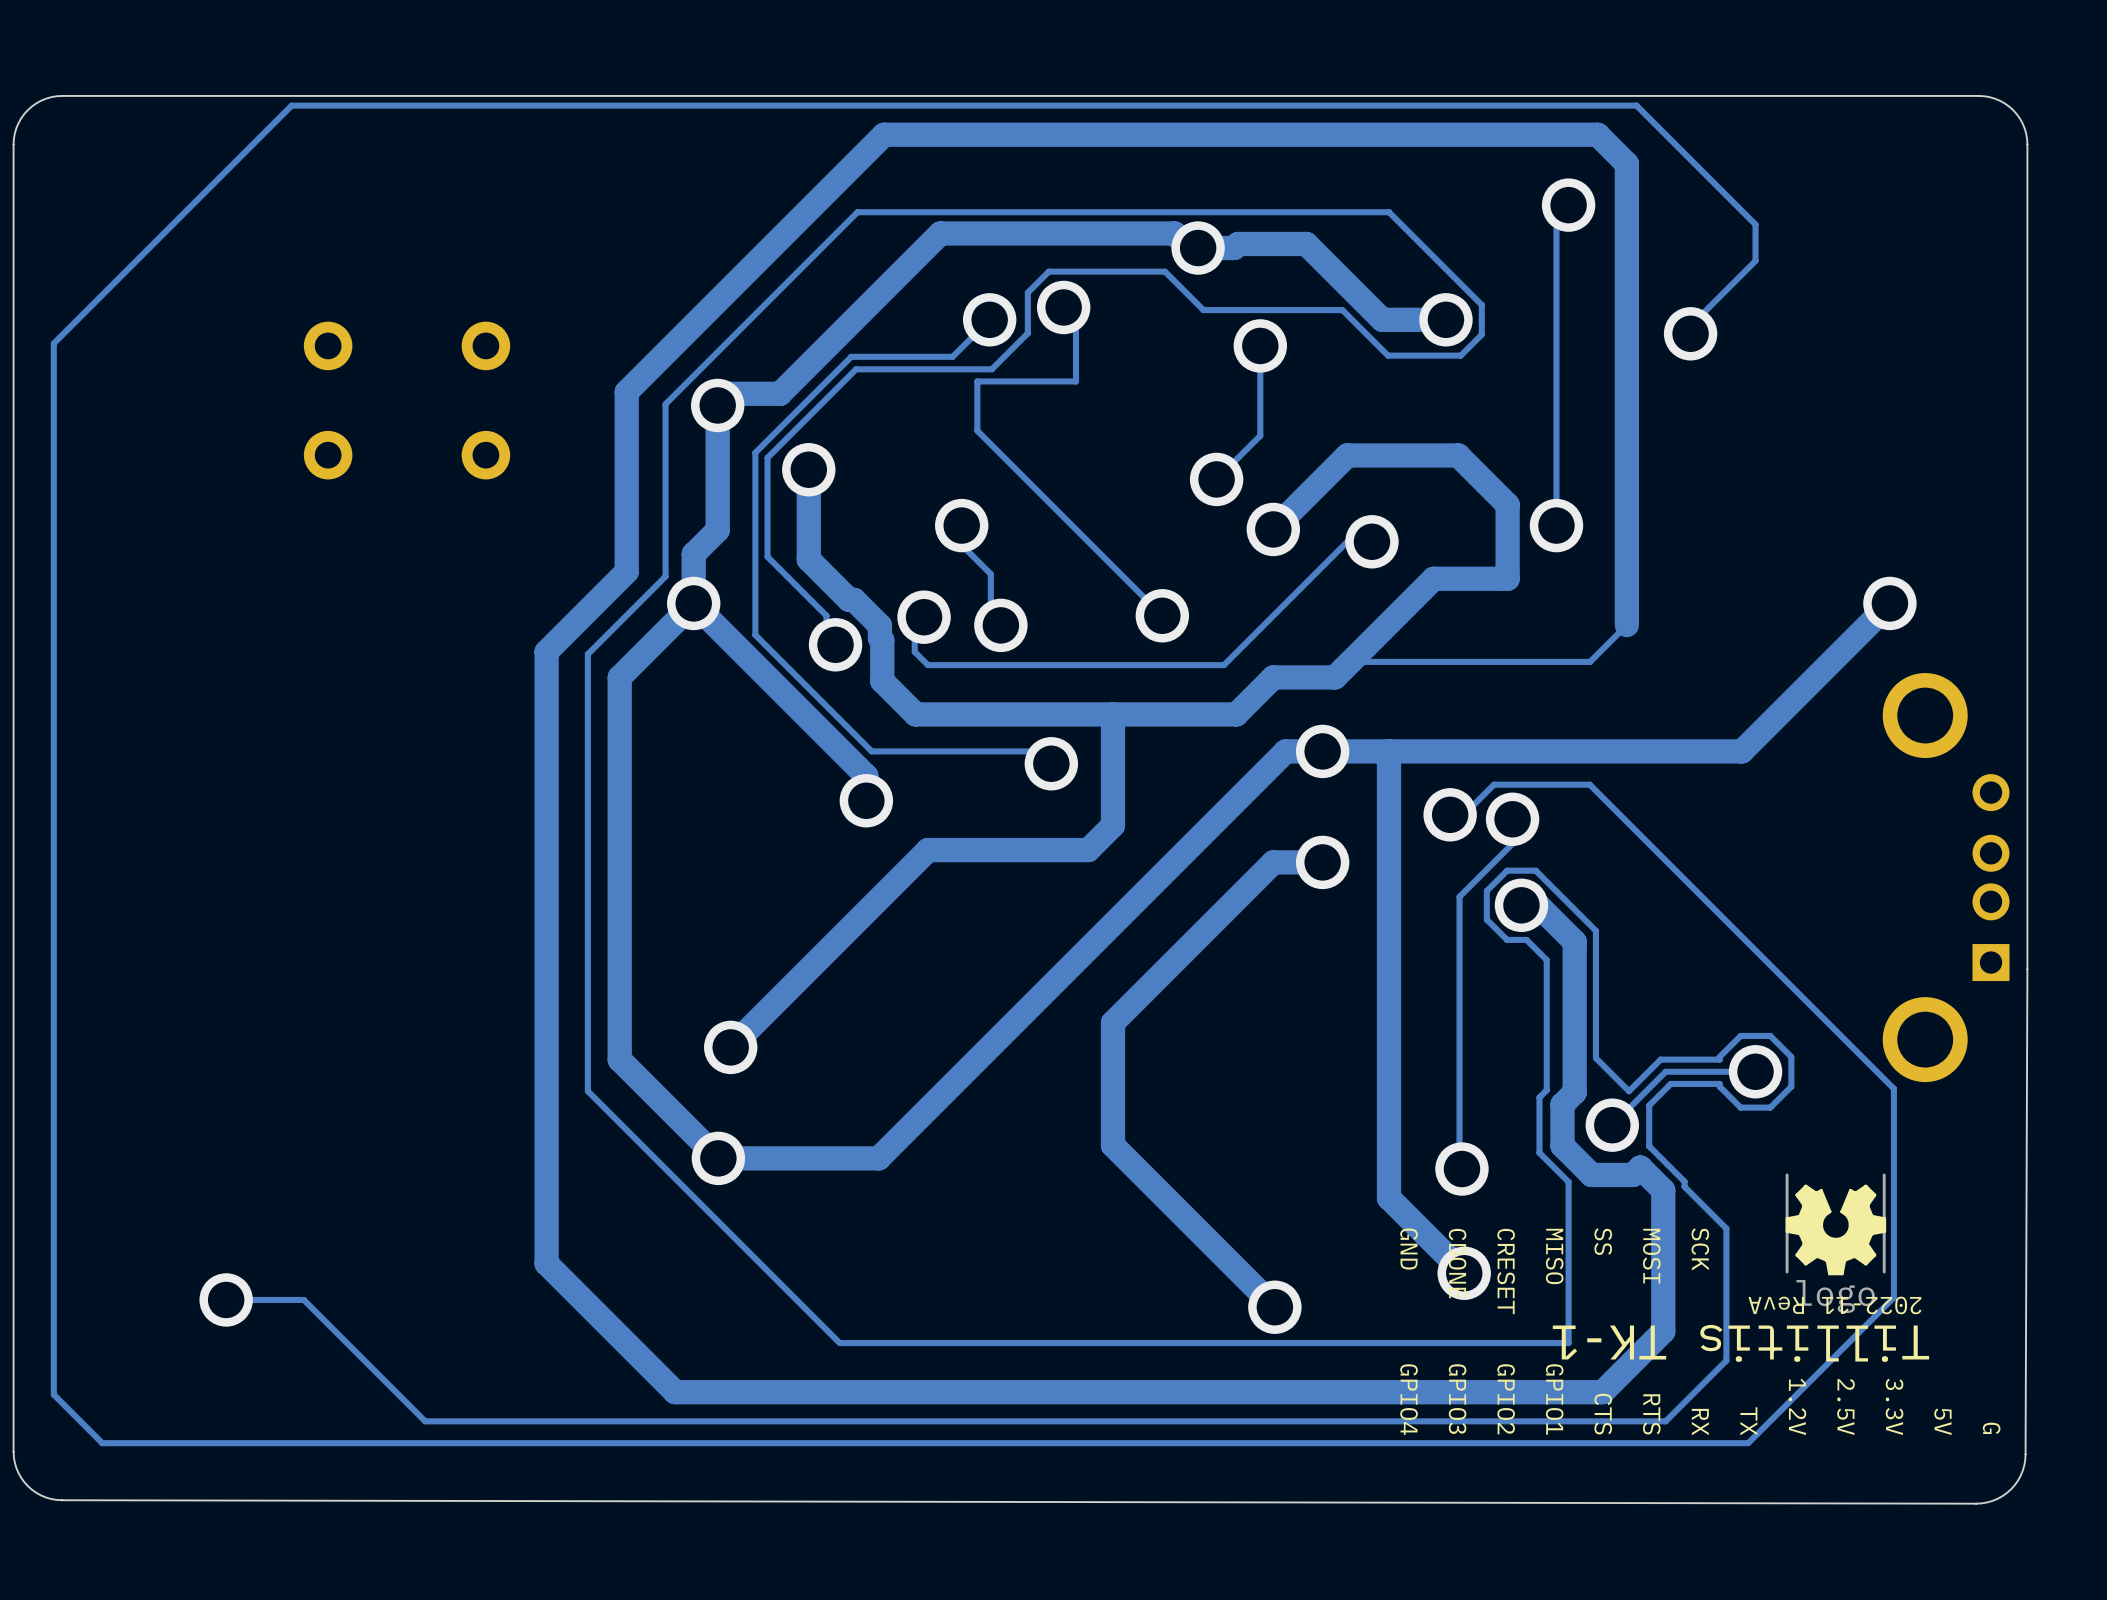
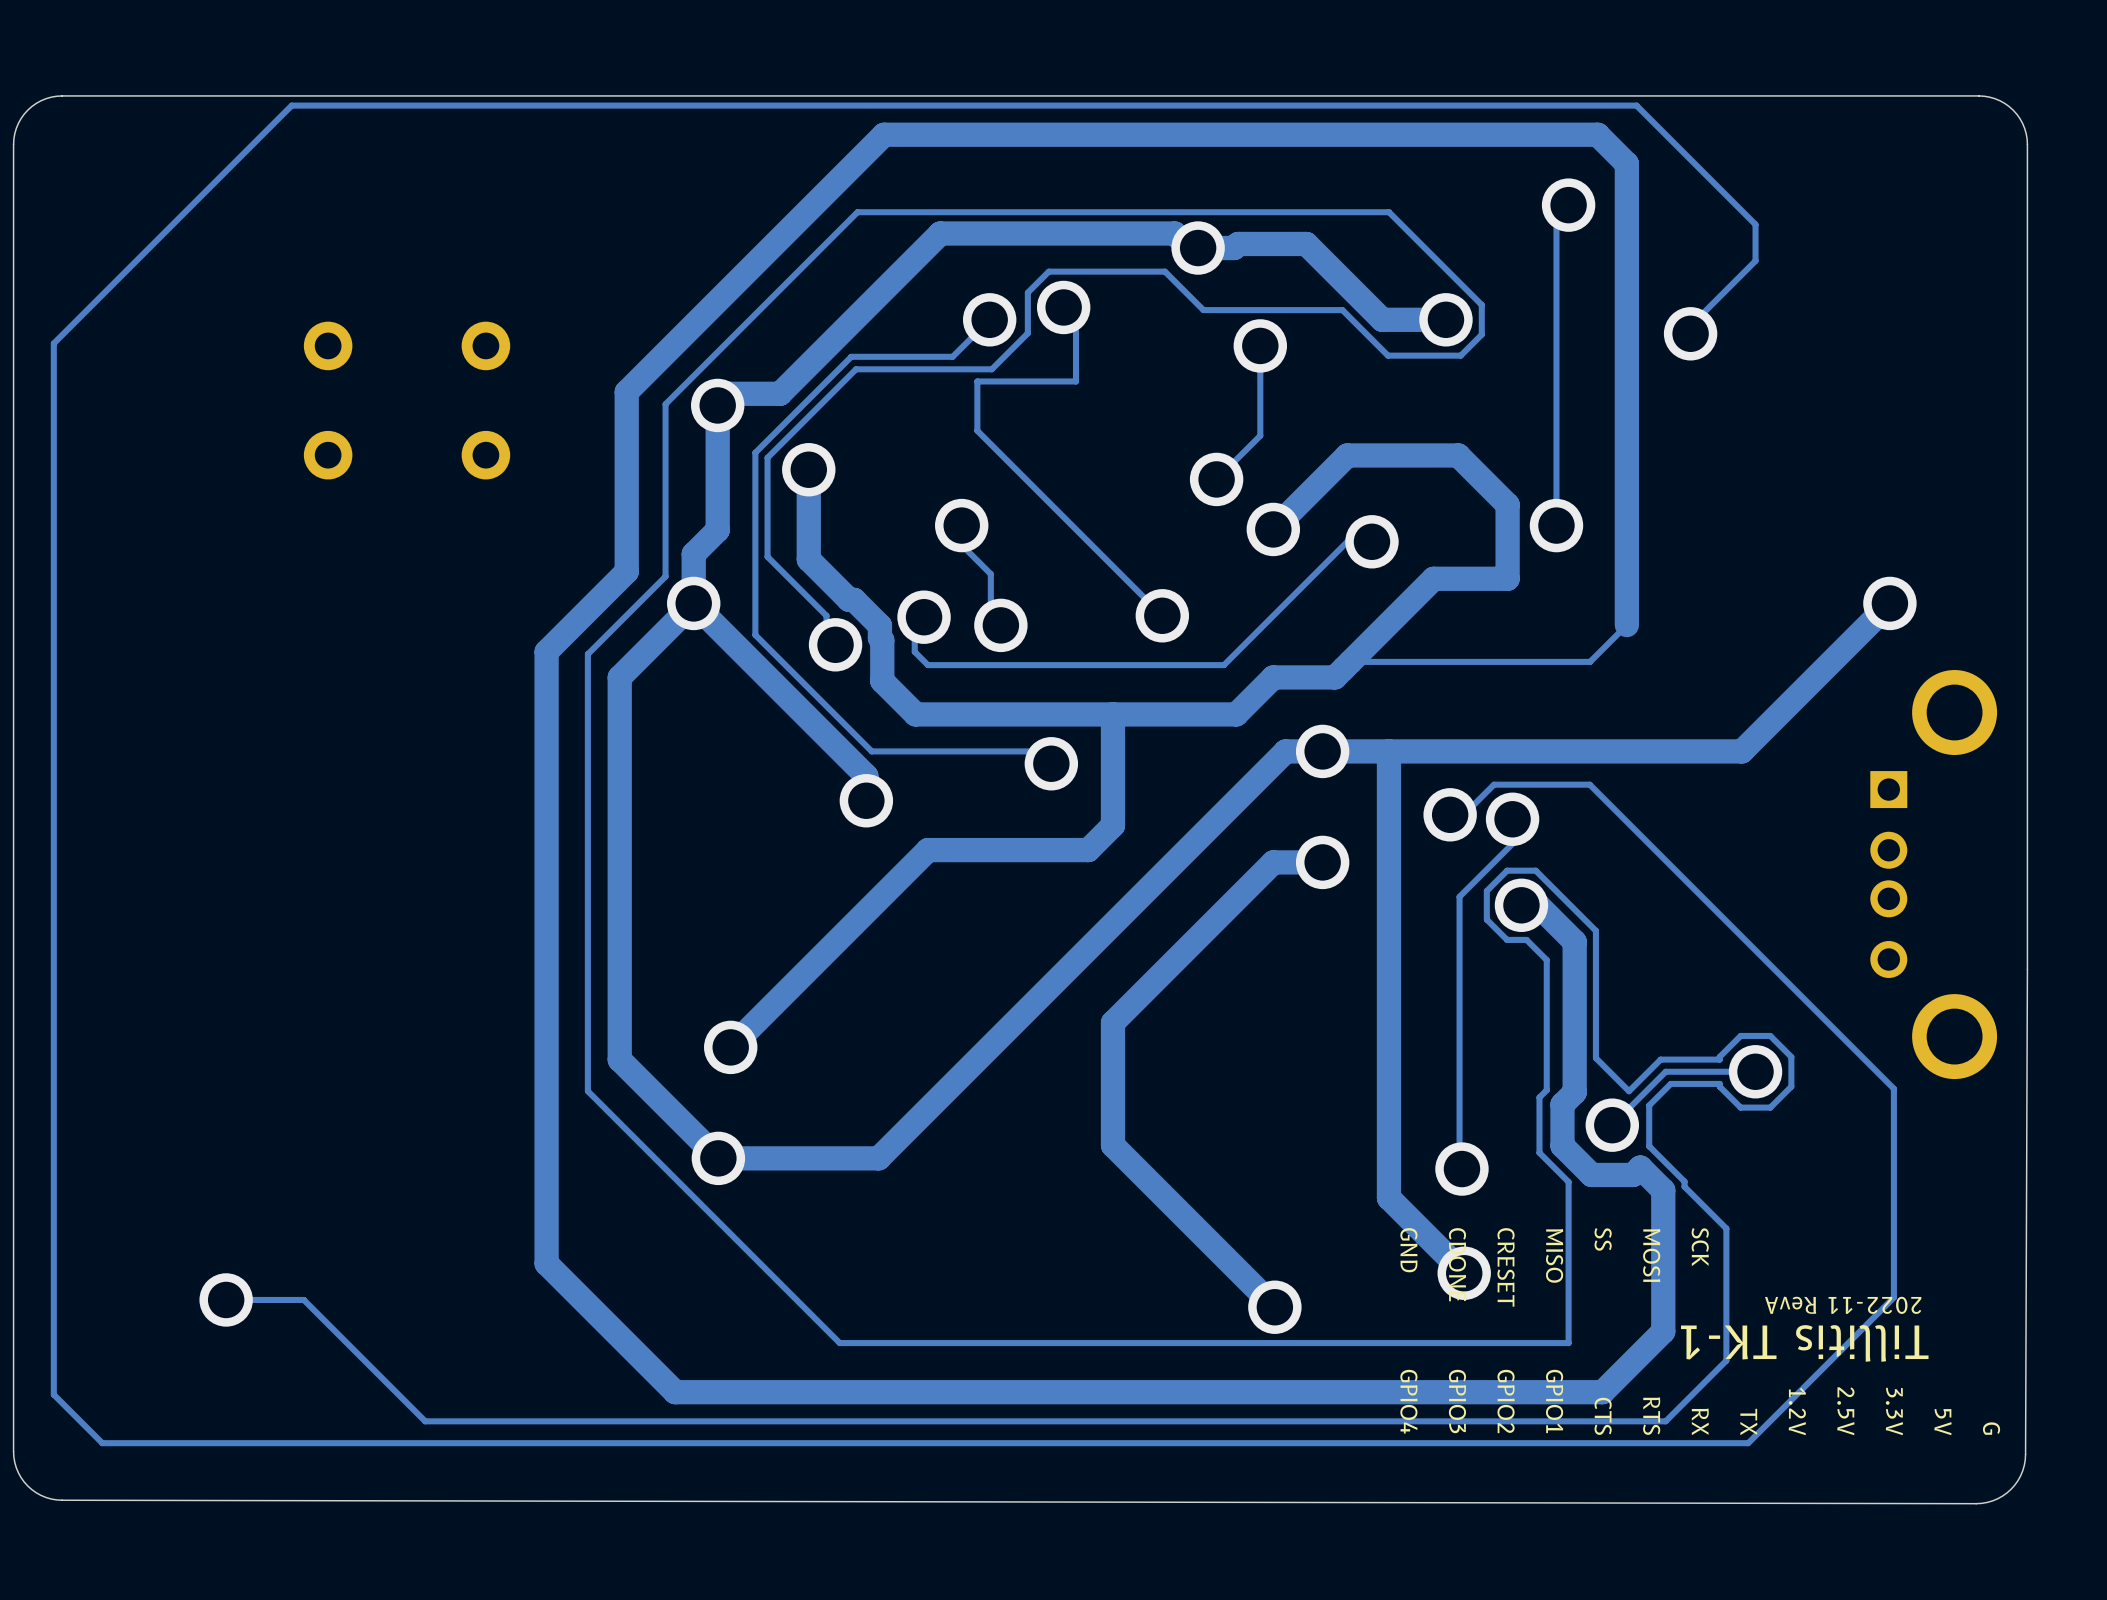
part rotation: 0° (1946, 877) -> 180° (1933, 874)
drawing: [1785, 1173, 1886, 1275] -> none

